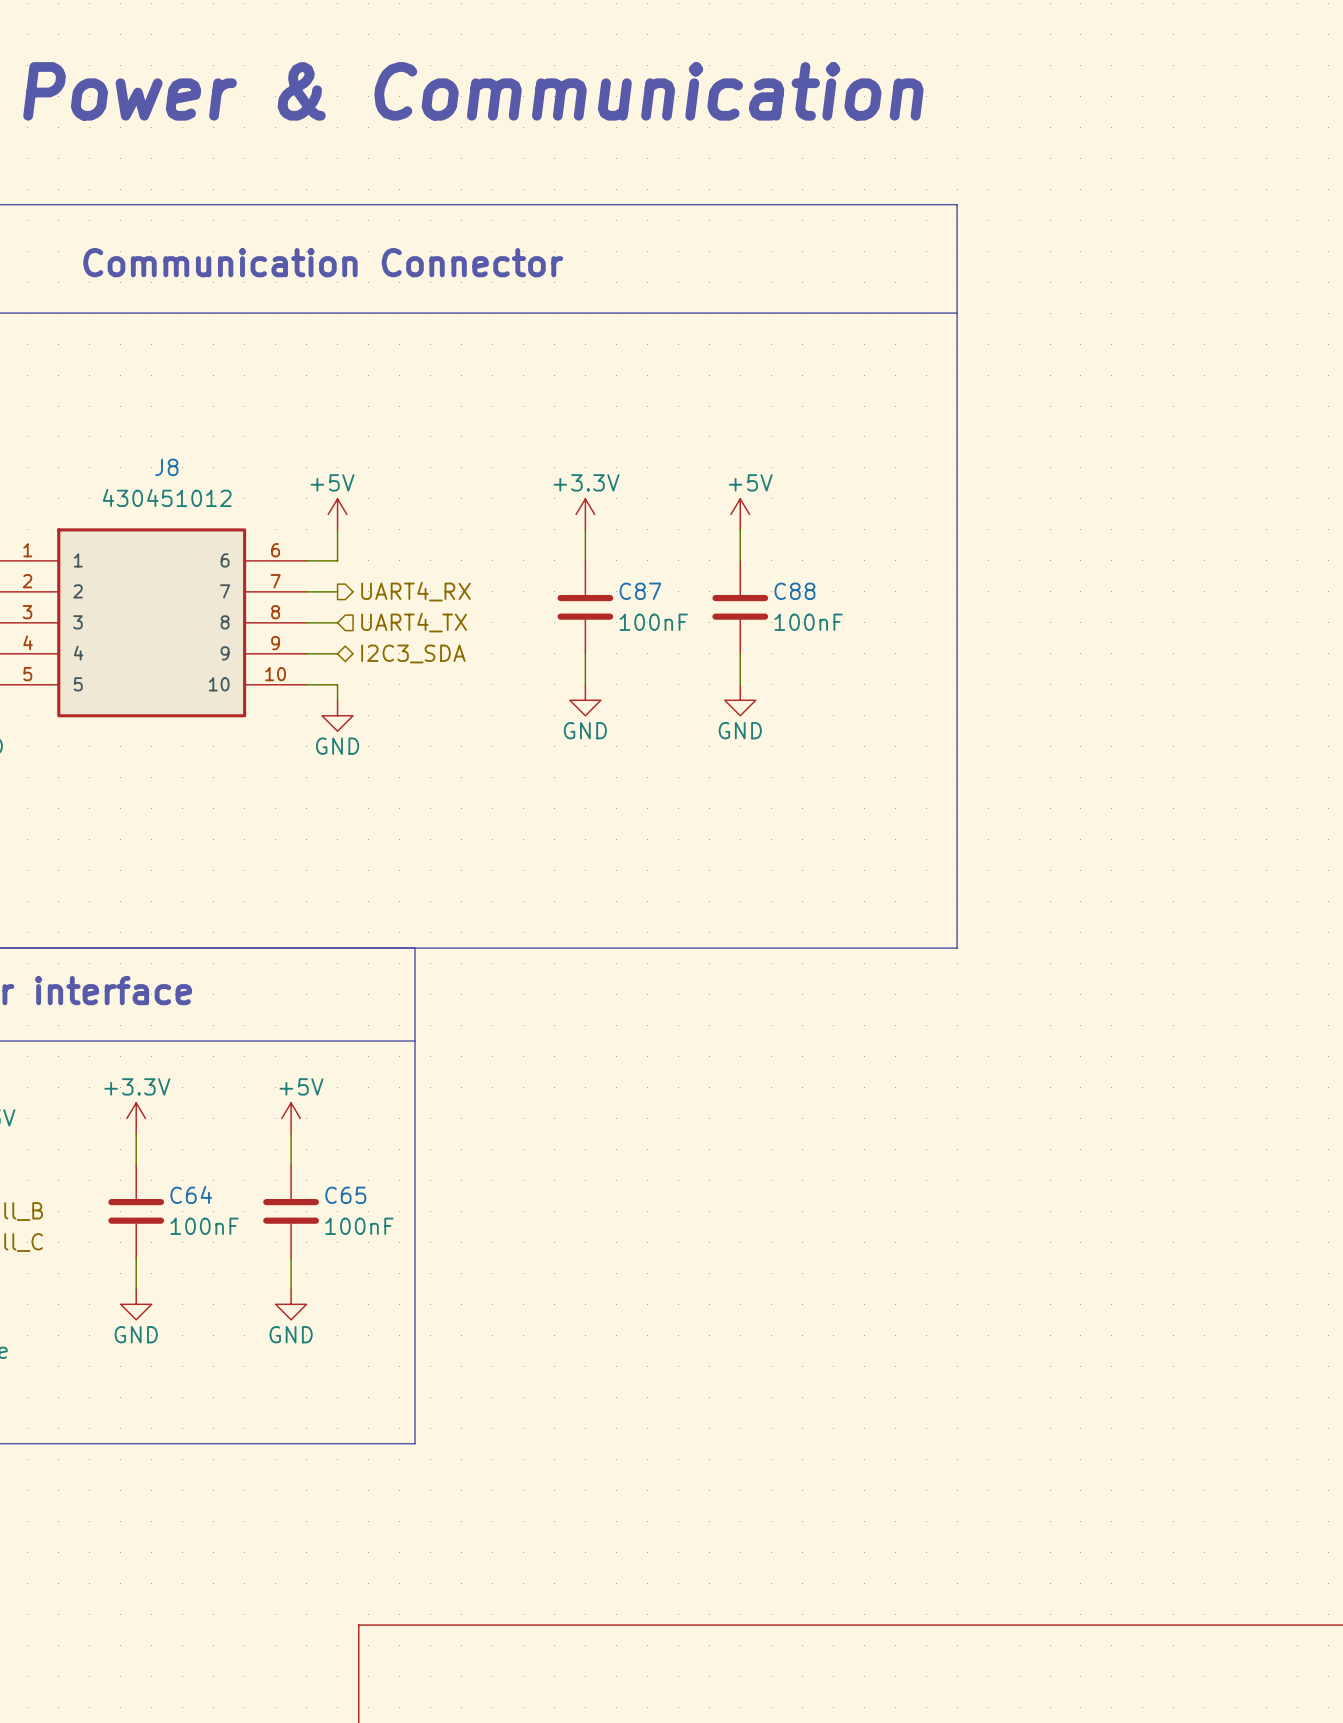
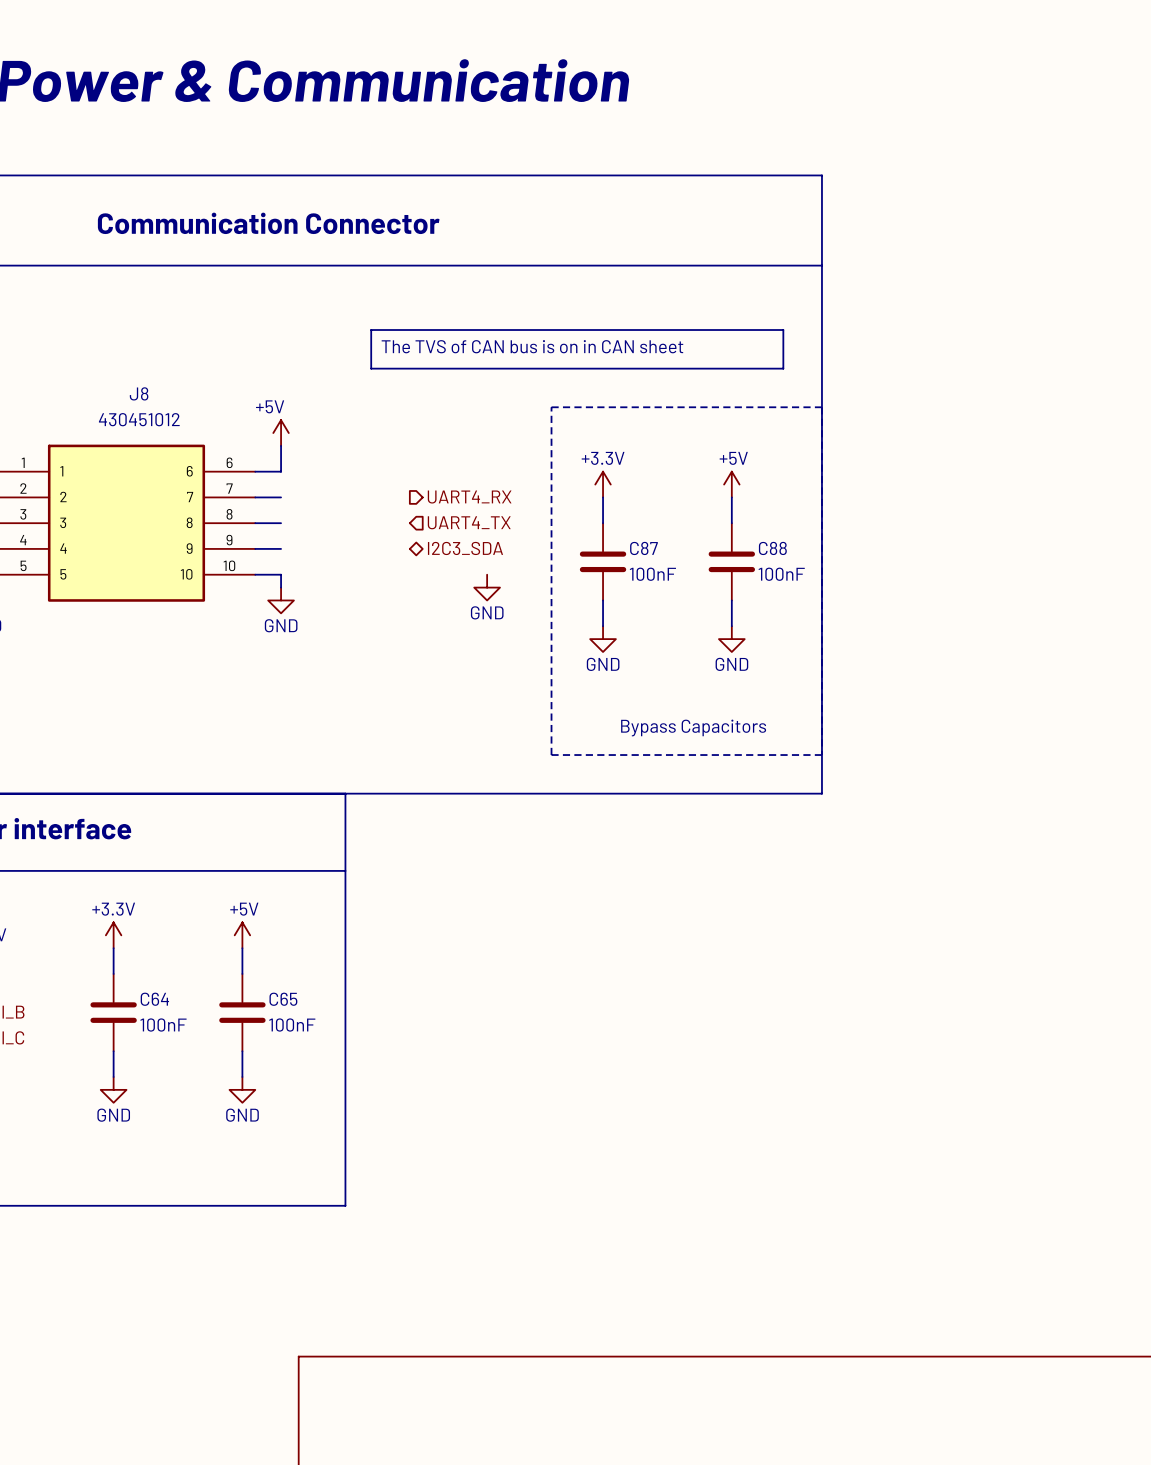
line: (957, 204) (957, 948) -> (796, 175) (821, 175) (821, 793) (796, 793)
line: none -> (796, 265) (821, 265)
line: none -> (371, 330) (783, 330) (783, 368) (371, 368) (371, 330)
text: none -> The TVS of CAN bus is on in CAN sheet (532, 346)
line: none -> (551, 407) (821, 407) (821, 755) (551, 755) (551, 407)
power symbol position: +3.3V (585, 514) -> +3.3V (603, 484)
power symbol position: +5V (740, 514) -> +5V (731, 484)
wire: (585, 529) (585, 560) -> (603, 497) (603, 523)
wire: (740, 529) (740, 560) -> (731, 497) (731, 523)
hierarchical label position: UART4_RX (415, 591) -> UART4_RX (469, 497)
C87 position: (585, 607) -> (603, 561)
C88 position: (740, 607) -> (731, 561)
hierarchical label position: UART4_TX (414, 622) -> UART4_TX (469, 522)
hierarchical label position: I2C3_SDA (413, 653) -> I2C3_SDA (465, 548)
wire: (585, 653) (585, 684) -> (603, 600) (603, 626)
wire: (740, 653) (740, 684) -> (731, 600) (731, 626)
power symbol position: GND (740, 700) -> GND (603, 639)
power symbol: none -> GND (731, 639)
text: none -> Bypass Capacitors (693, 727)

